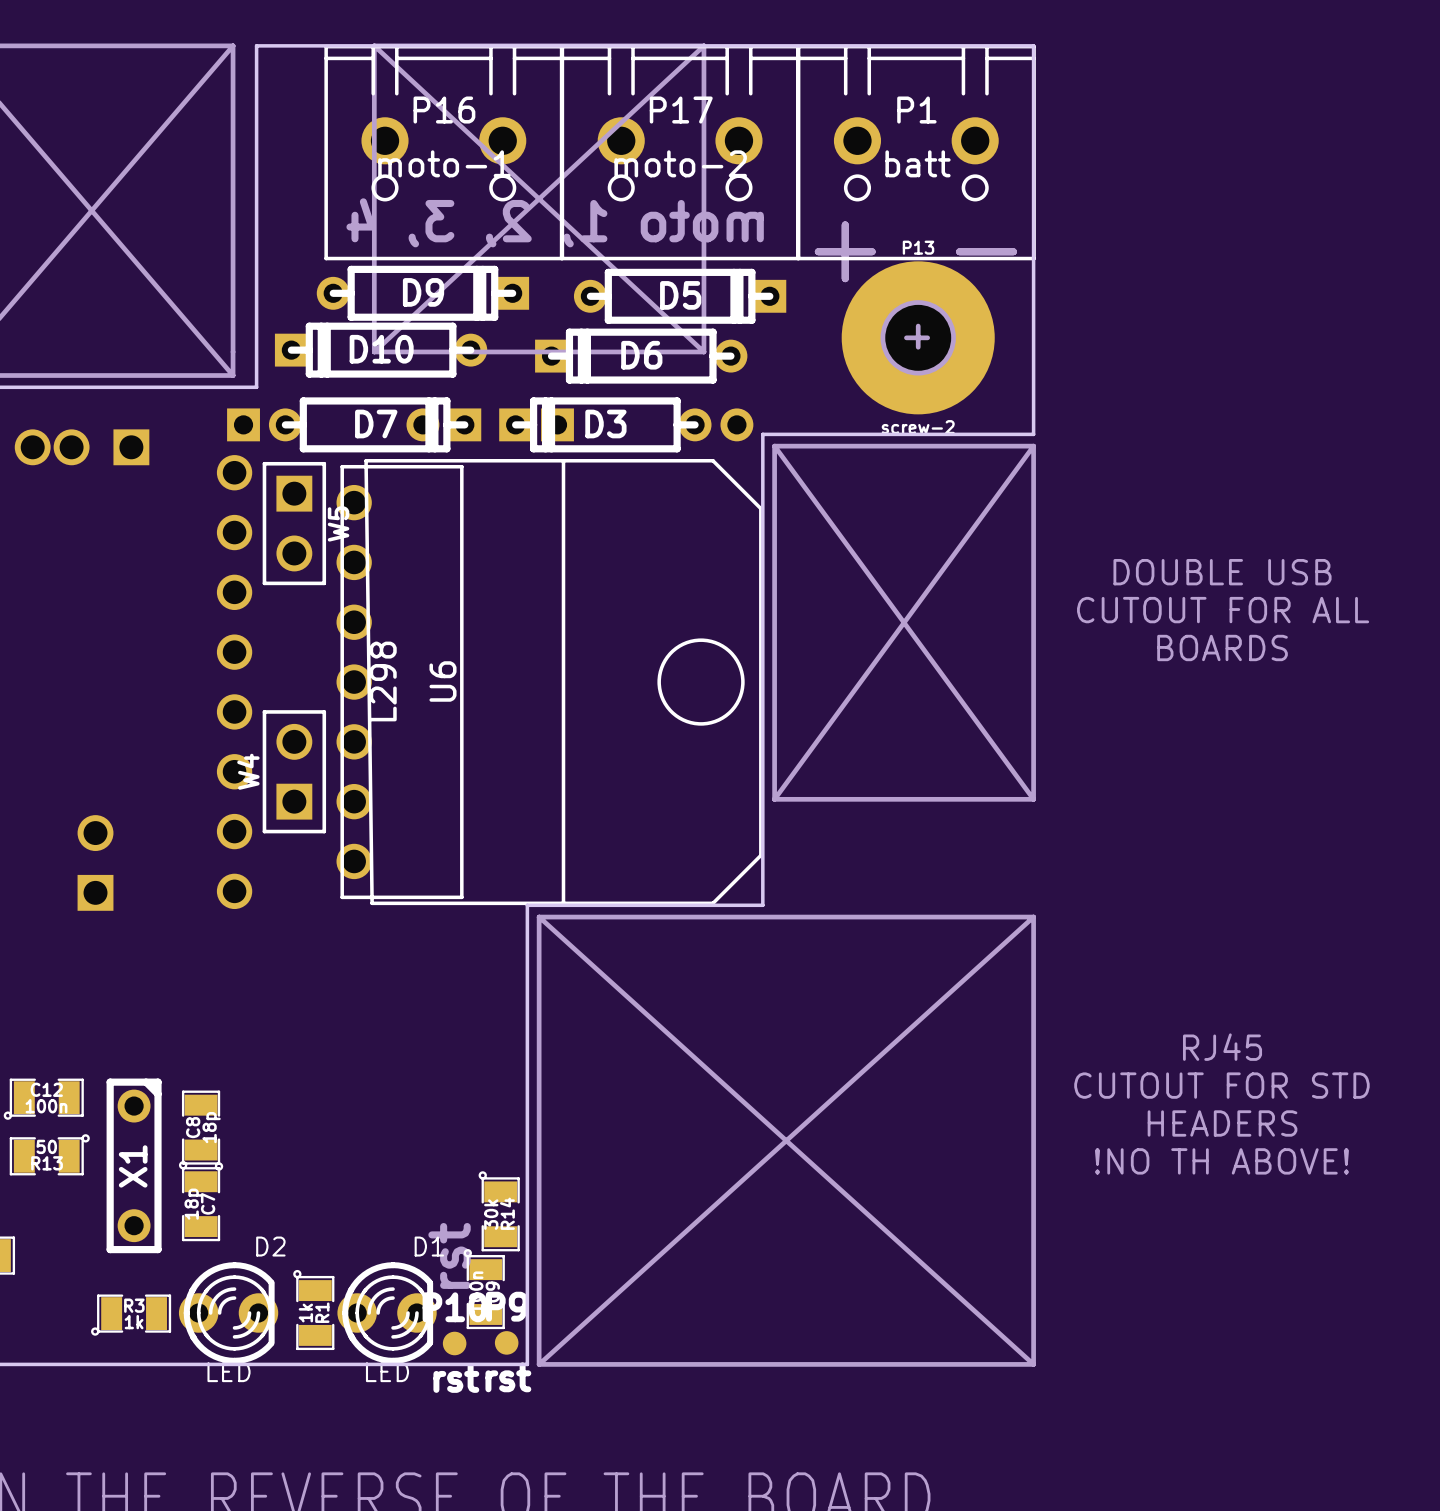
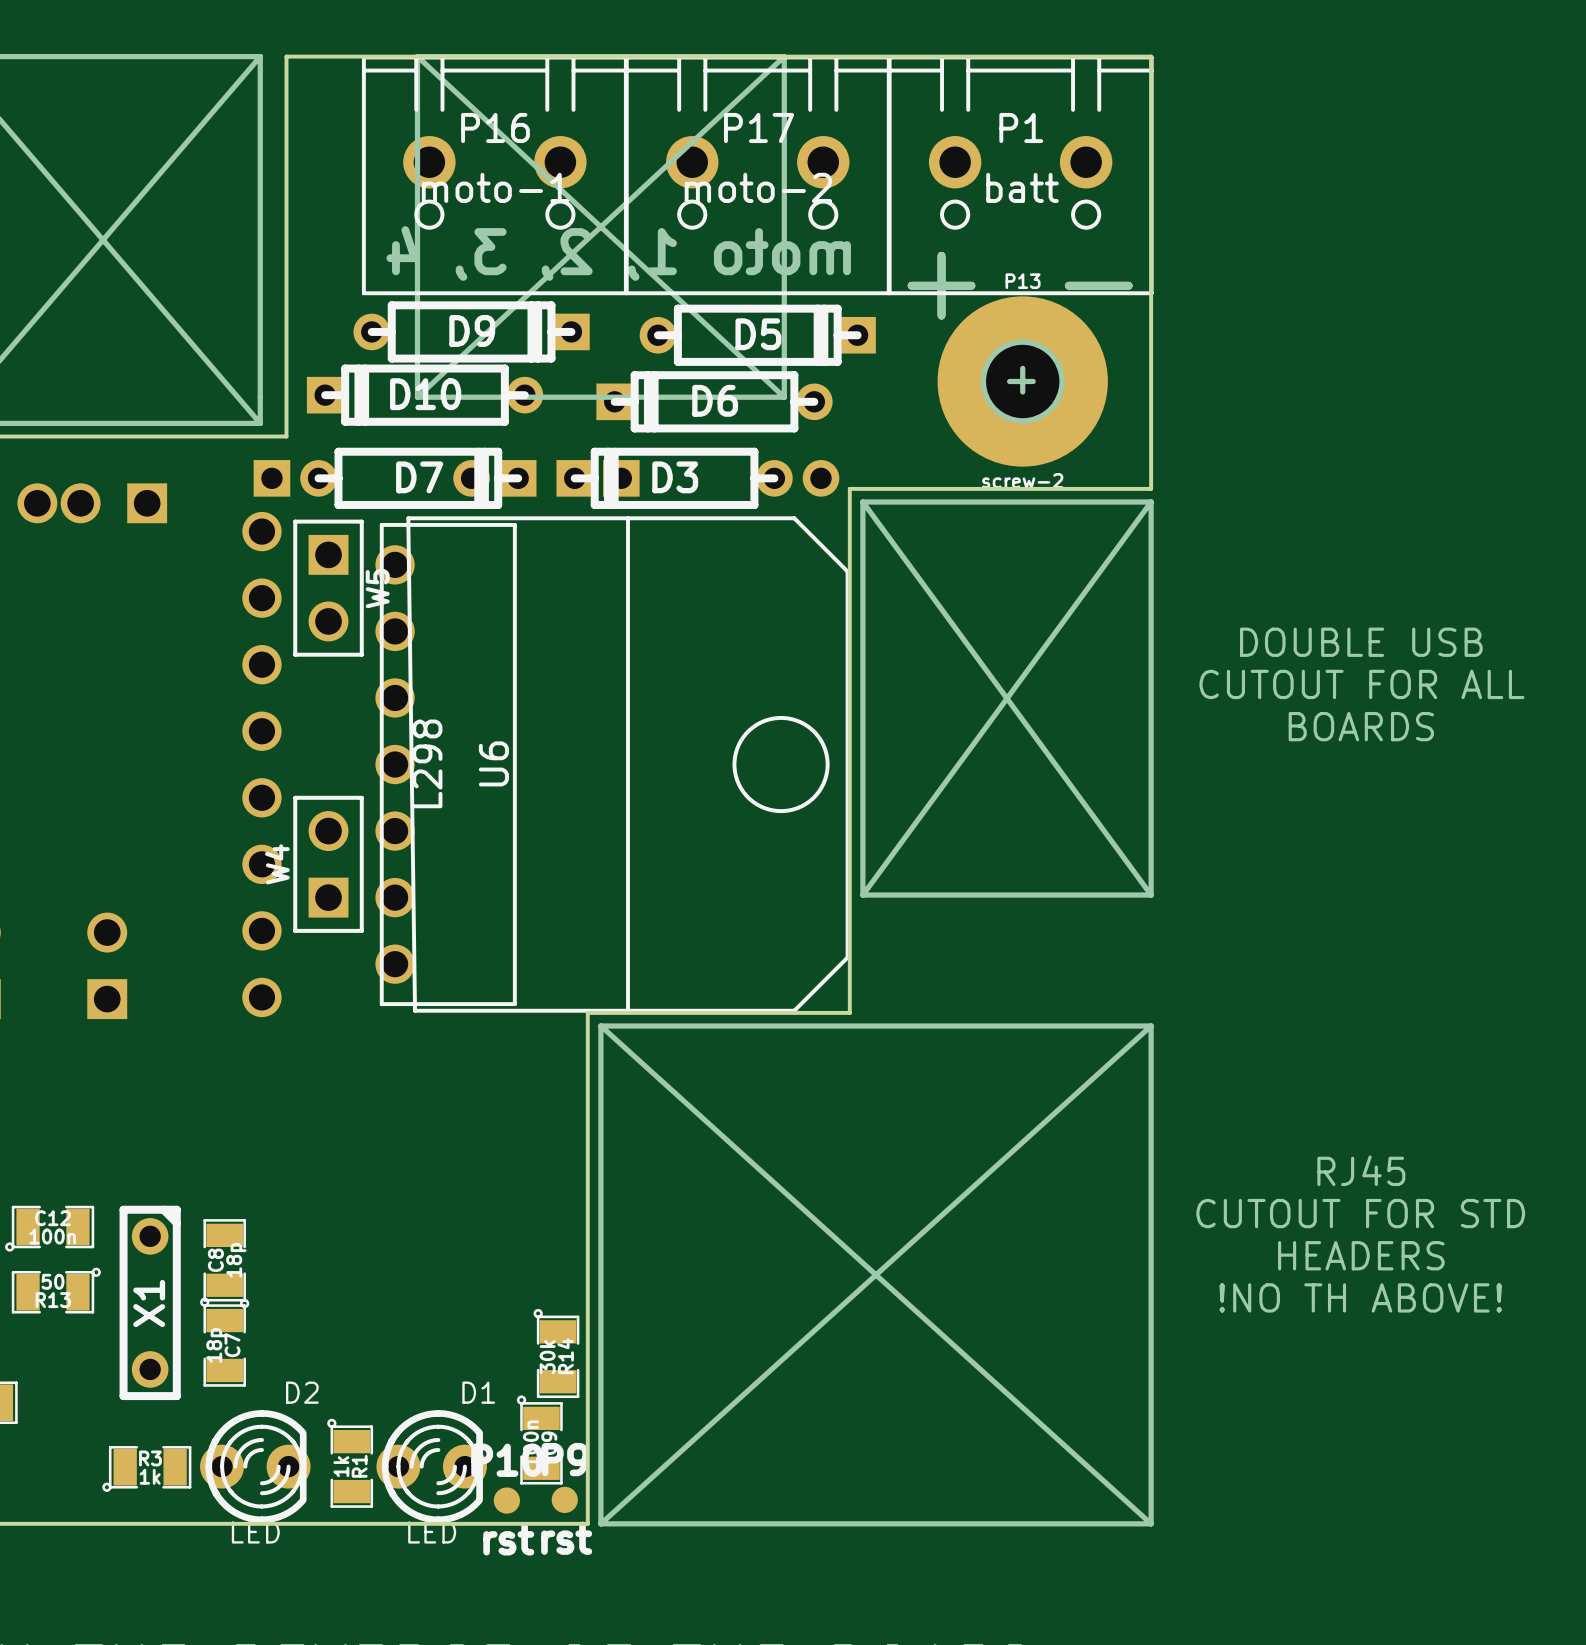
text: rst (449, 1255) -> none

